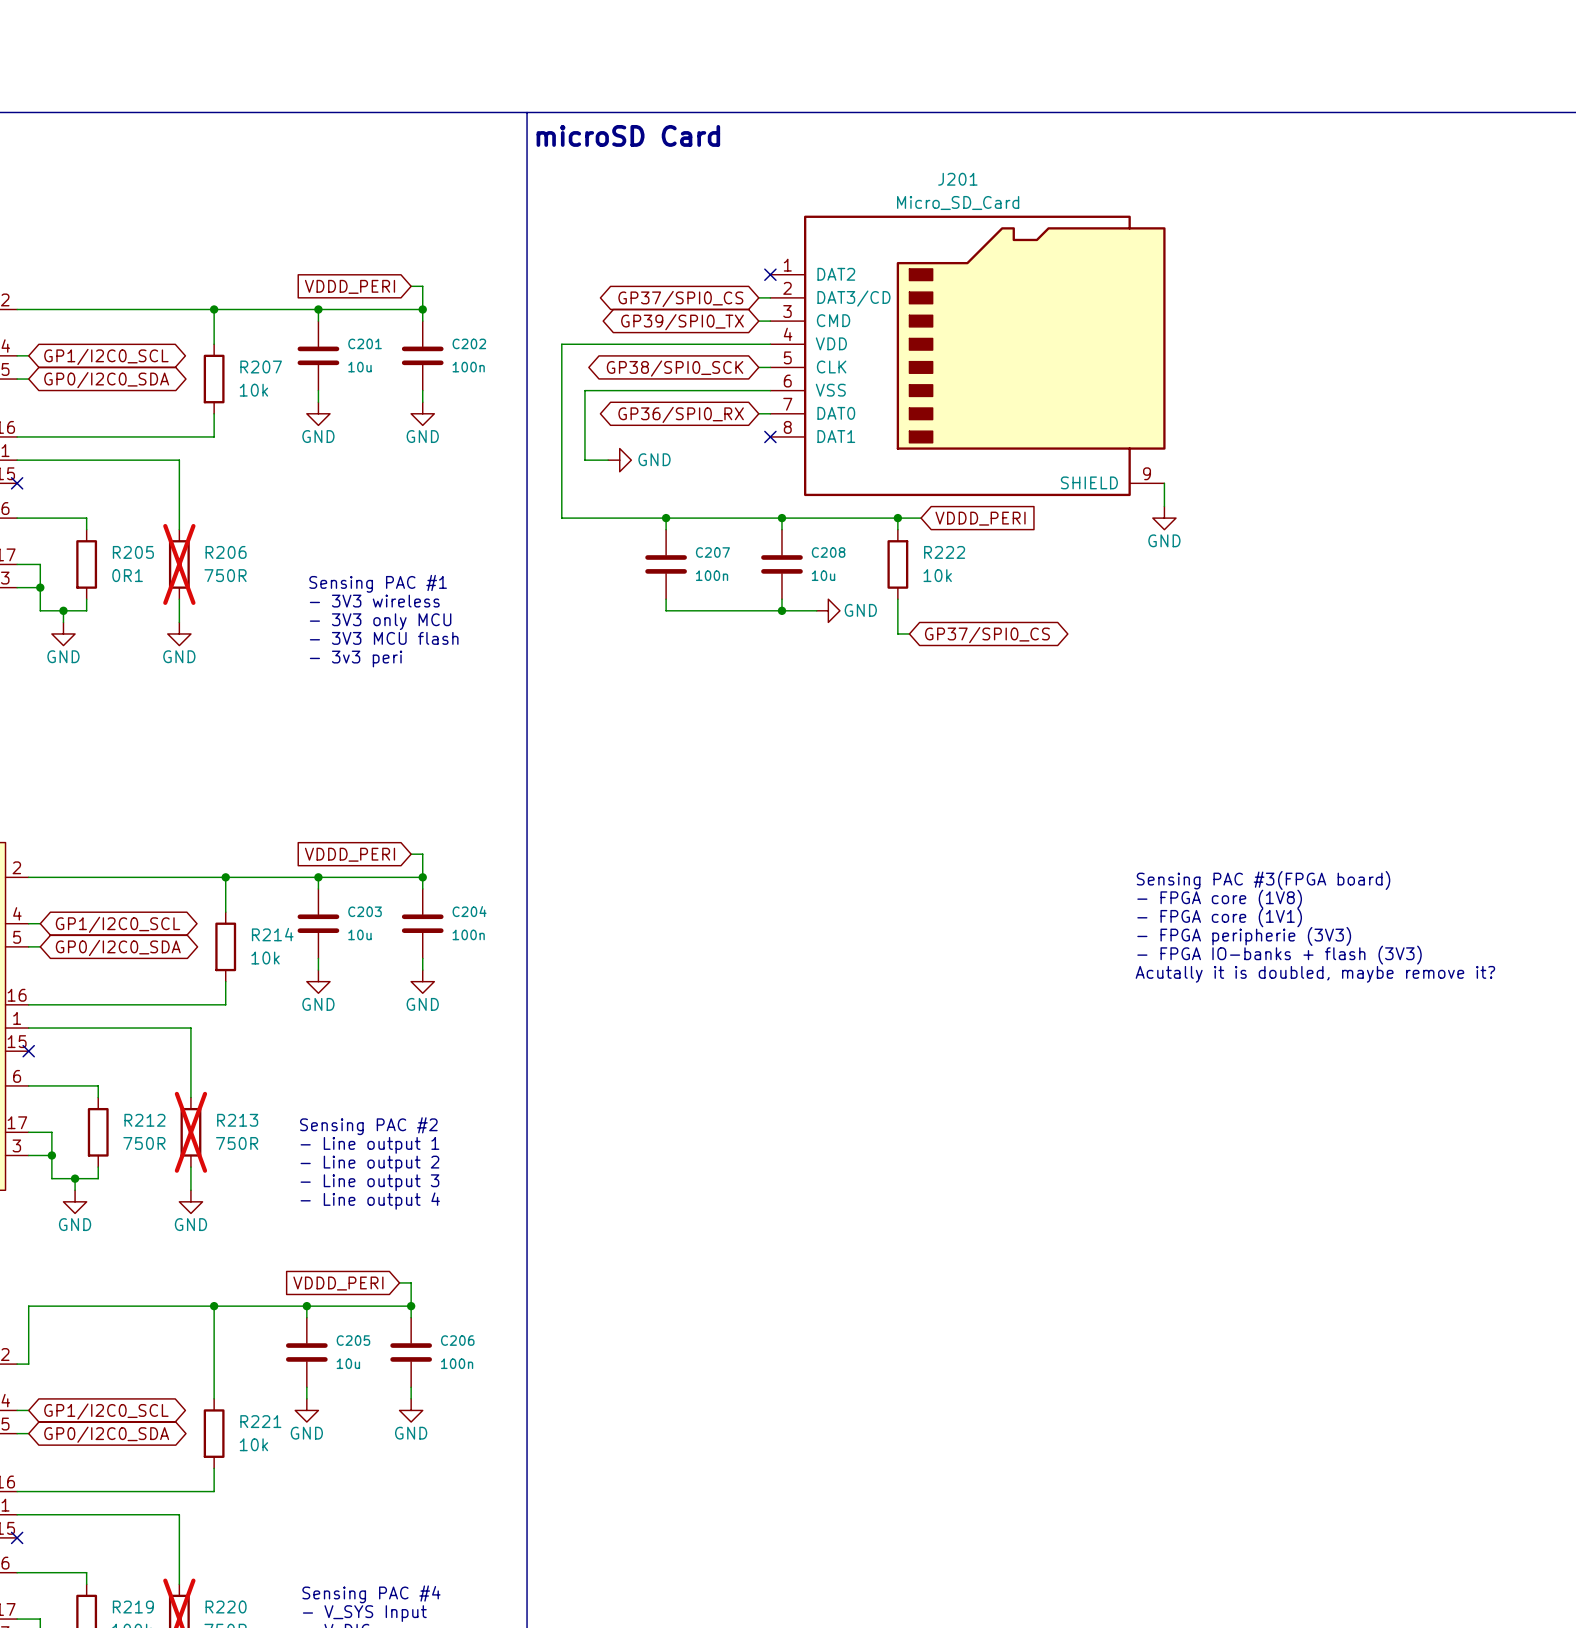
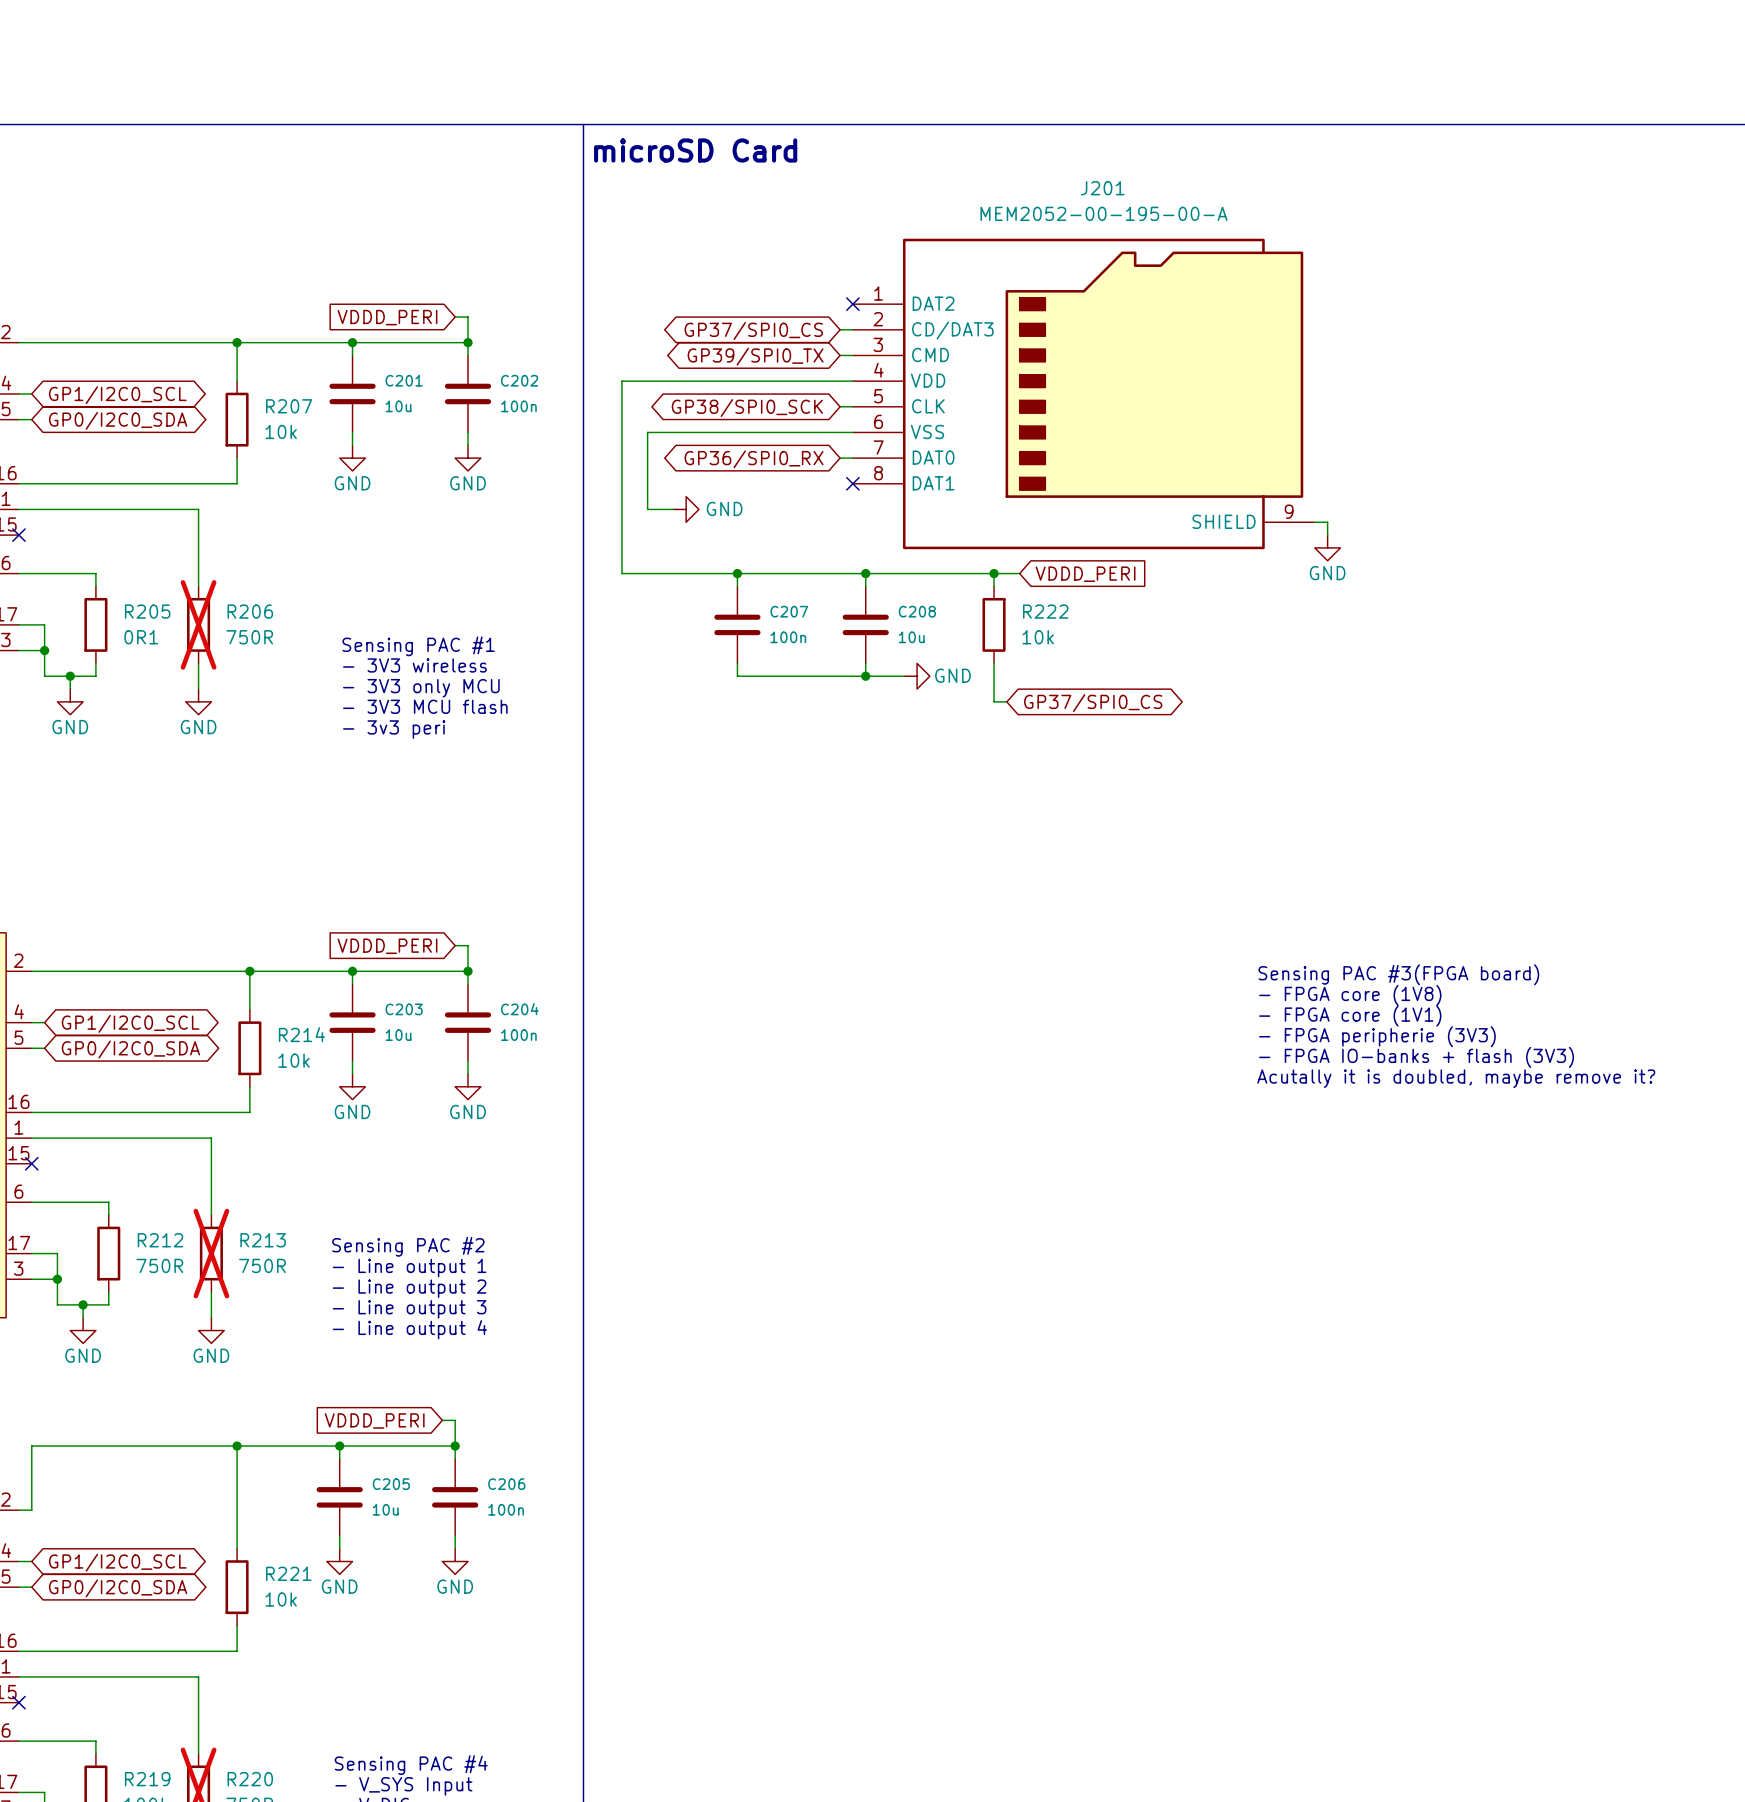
J201 name position: J201 (957, 179) -> J201 (1102, 188)
J201 value: Micro_SD_Card (958, 202) -> MEM2052-00-195-00-A (1104, 213)
J201 symbol: [770, 215, 1166, 497] -> [852, 238, 1315, 550]
wire: none -> (1314, 522) (1327, 522) (1327, 535)
wire: (1164, 483) (1164, 506) -> none
power symbol position: GND (1164, 518) -> GND (1327, 547)

